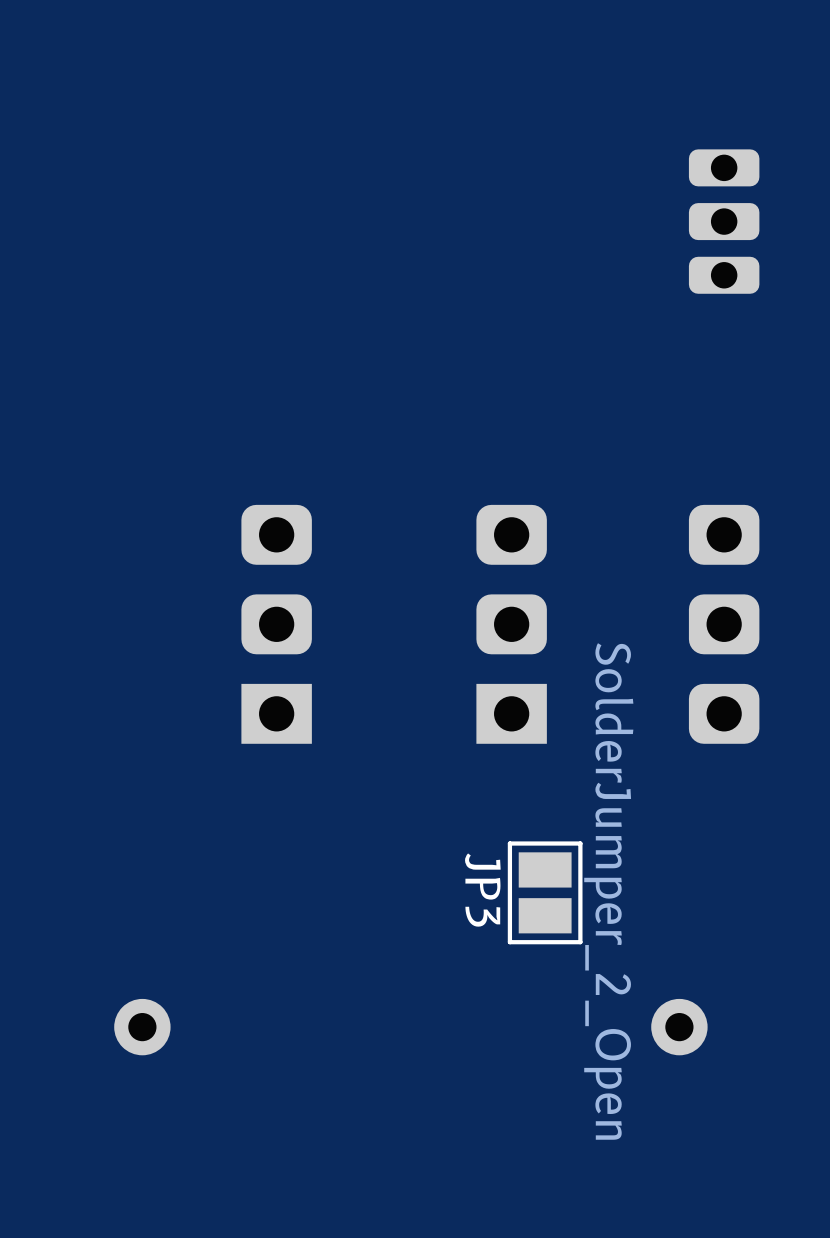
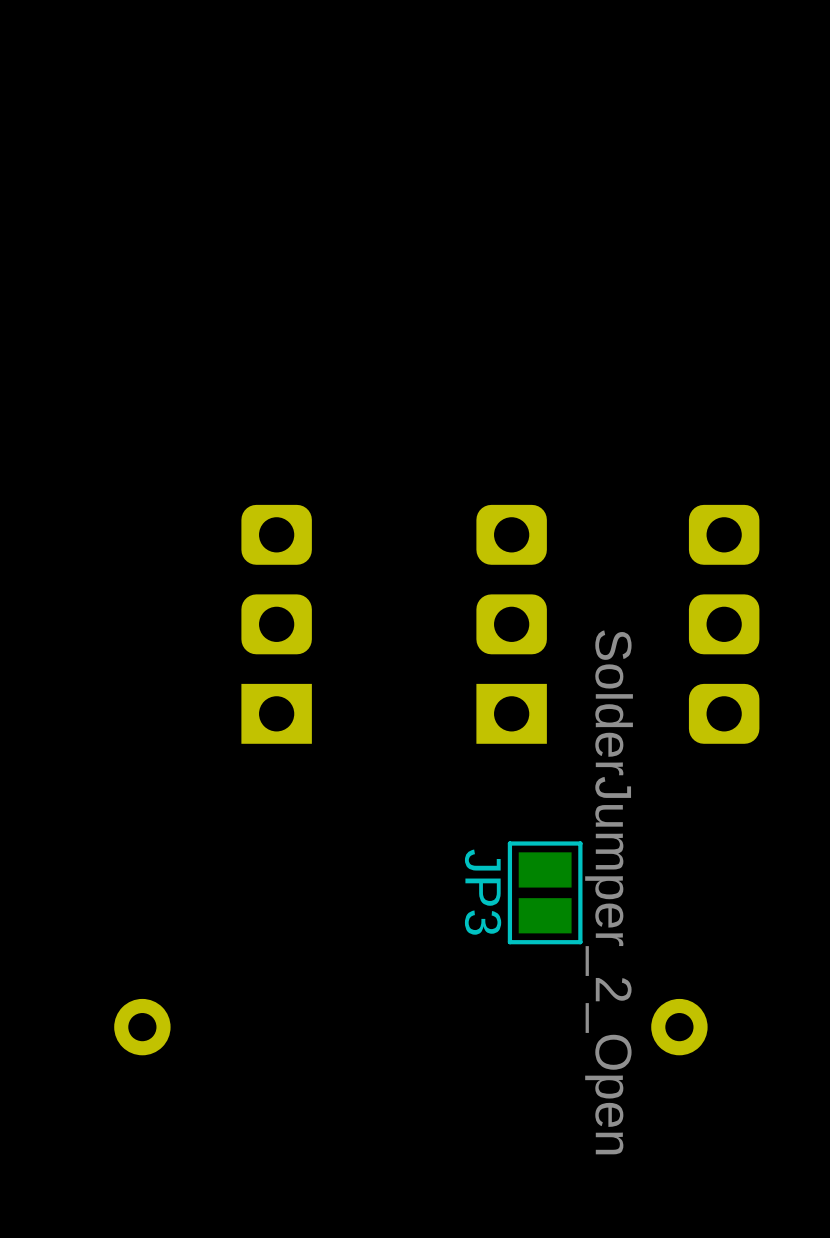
part: (724, 221) -> none

